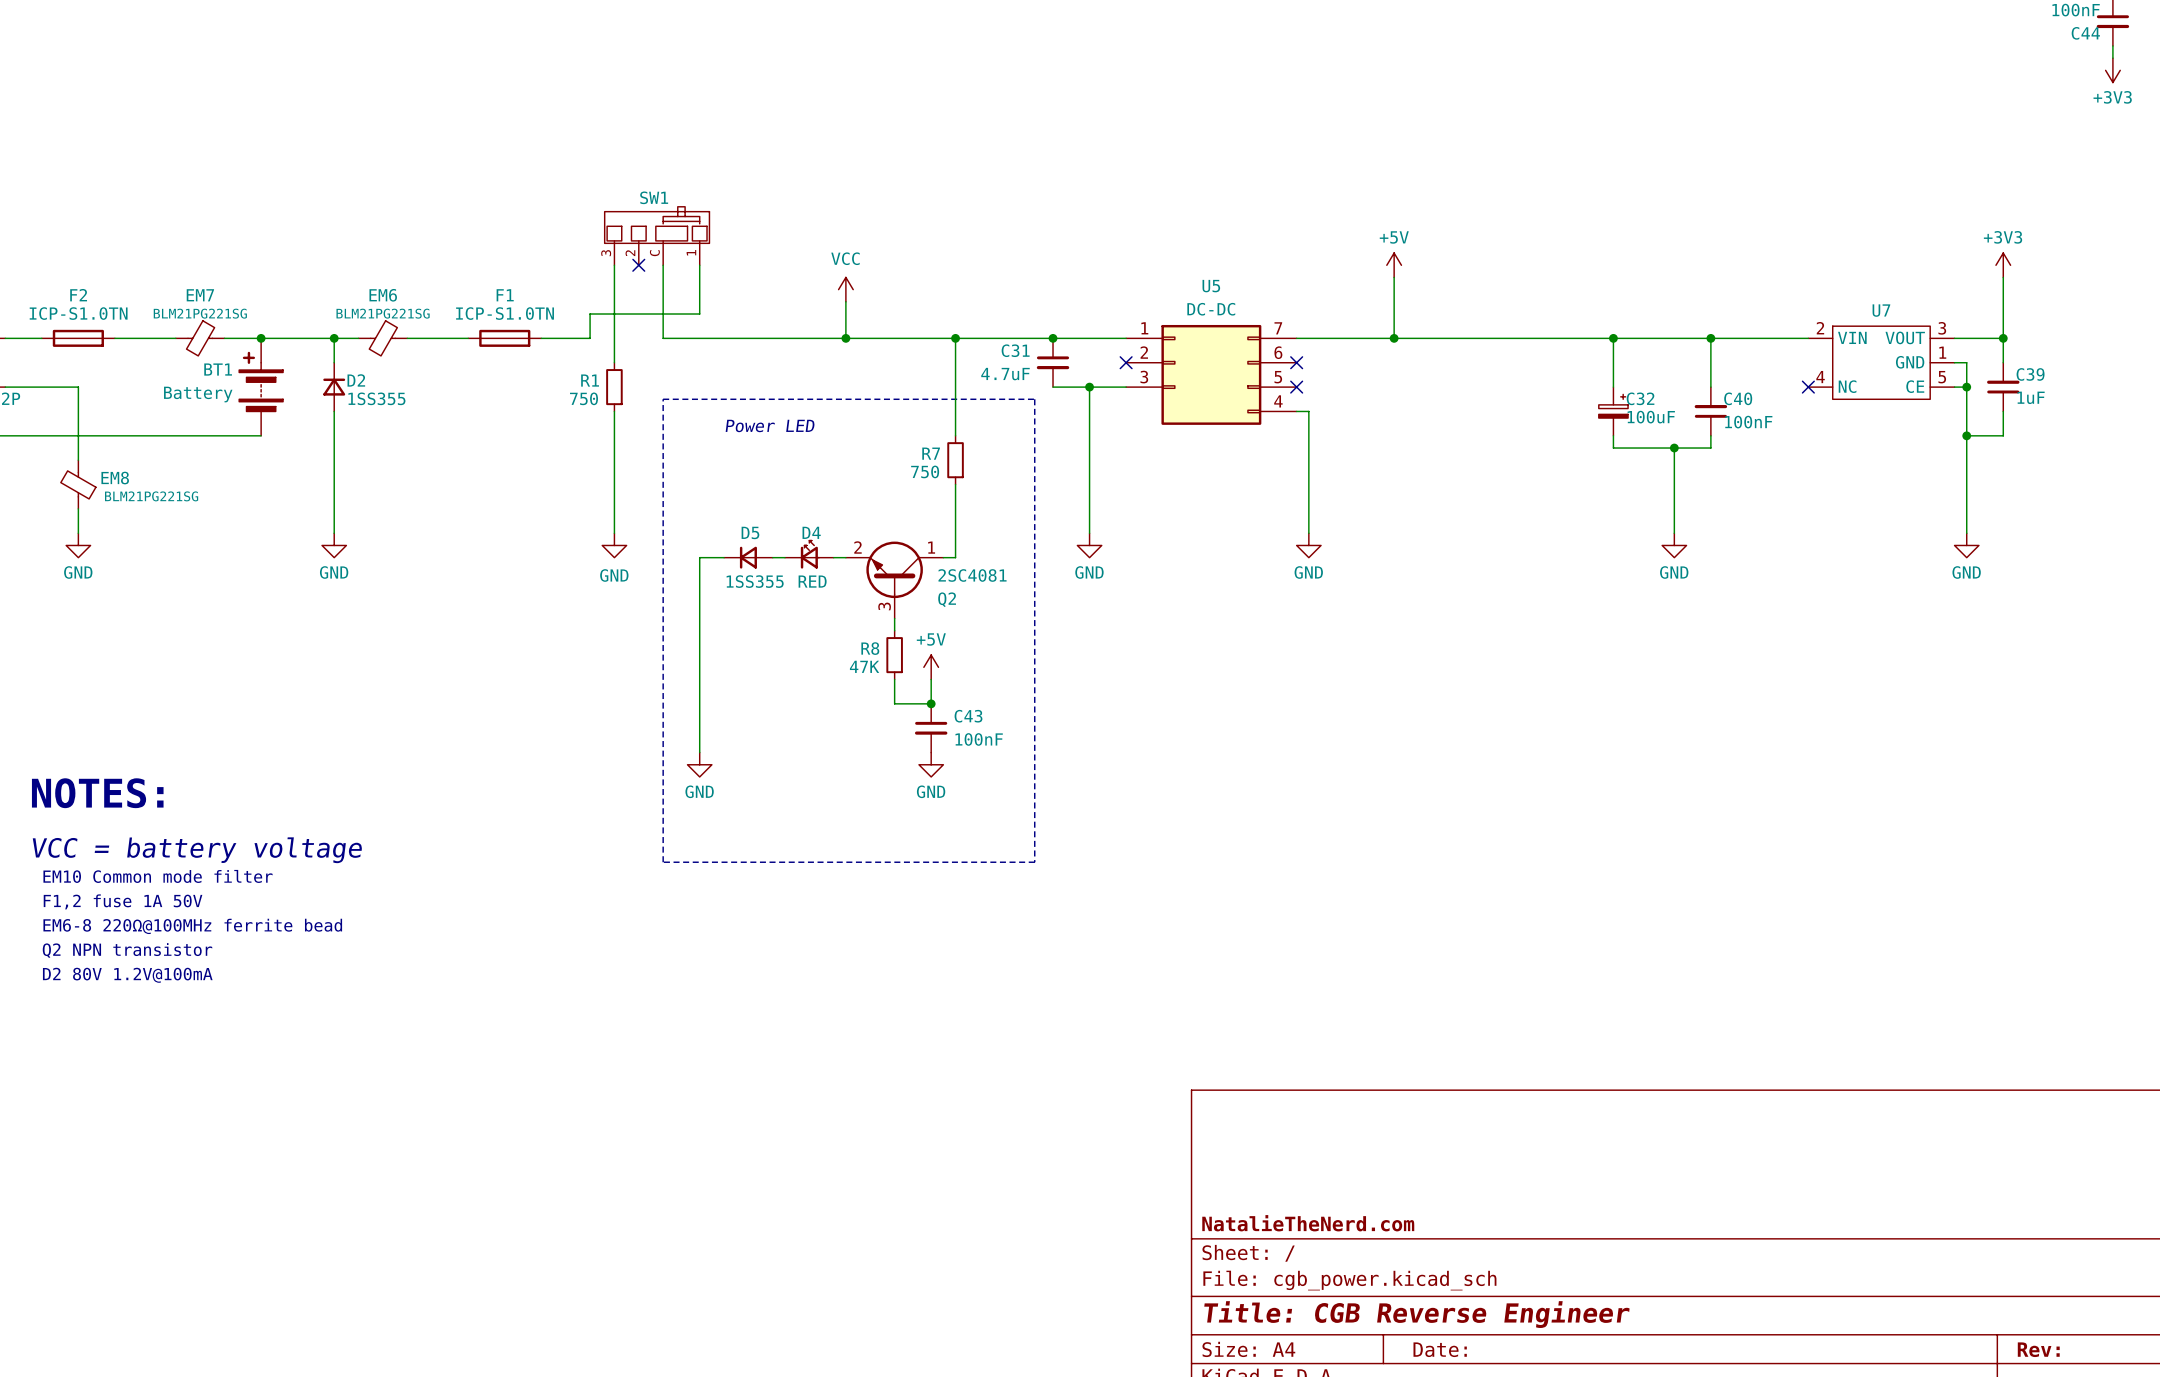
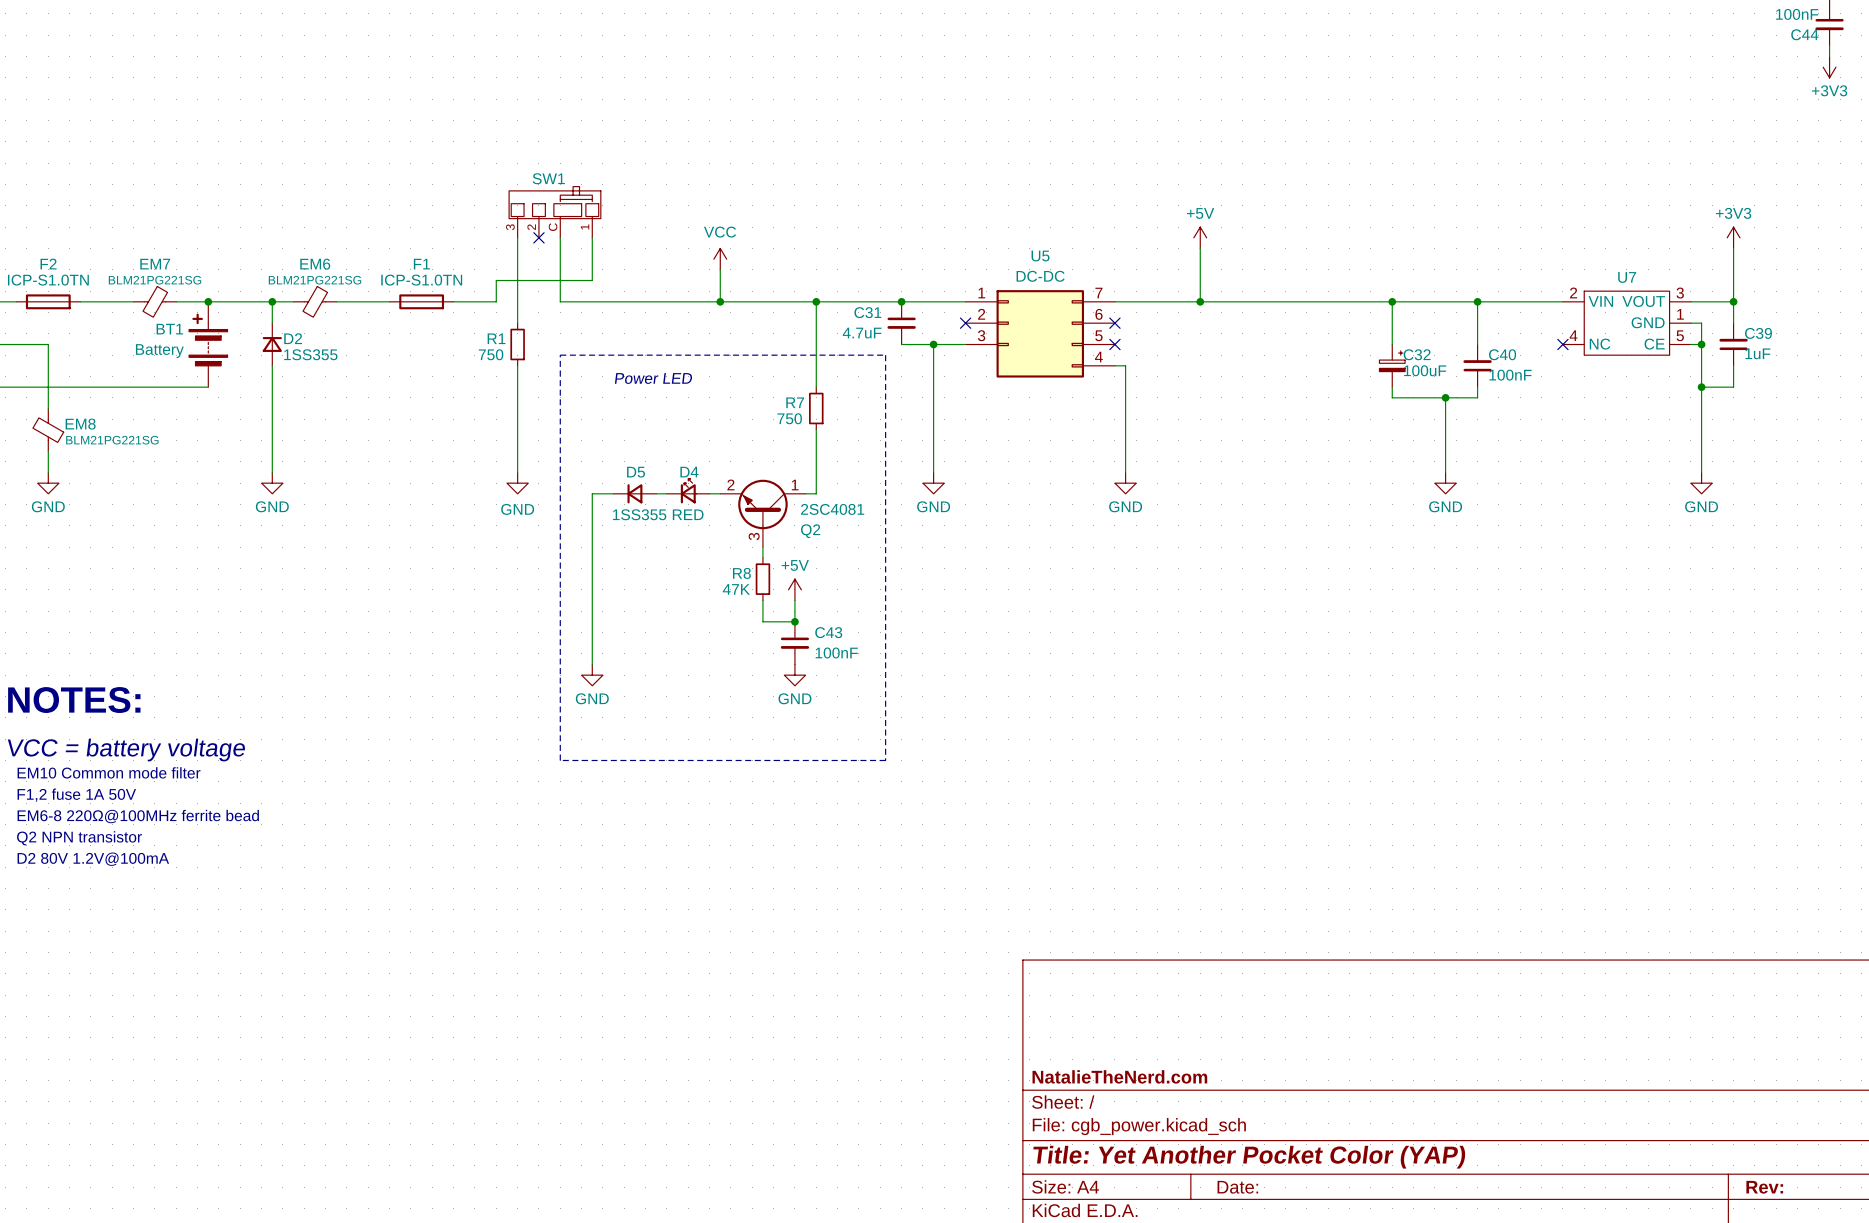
title block: Title: CGB Reverse Engineer (1416, 1314) -> Title: Yet Another Pocket Color (YAP) (1249, 1157)

